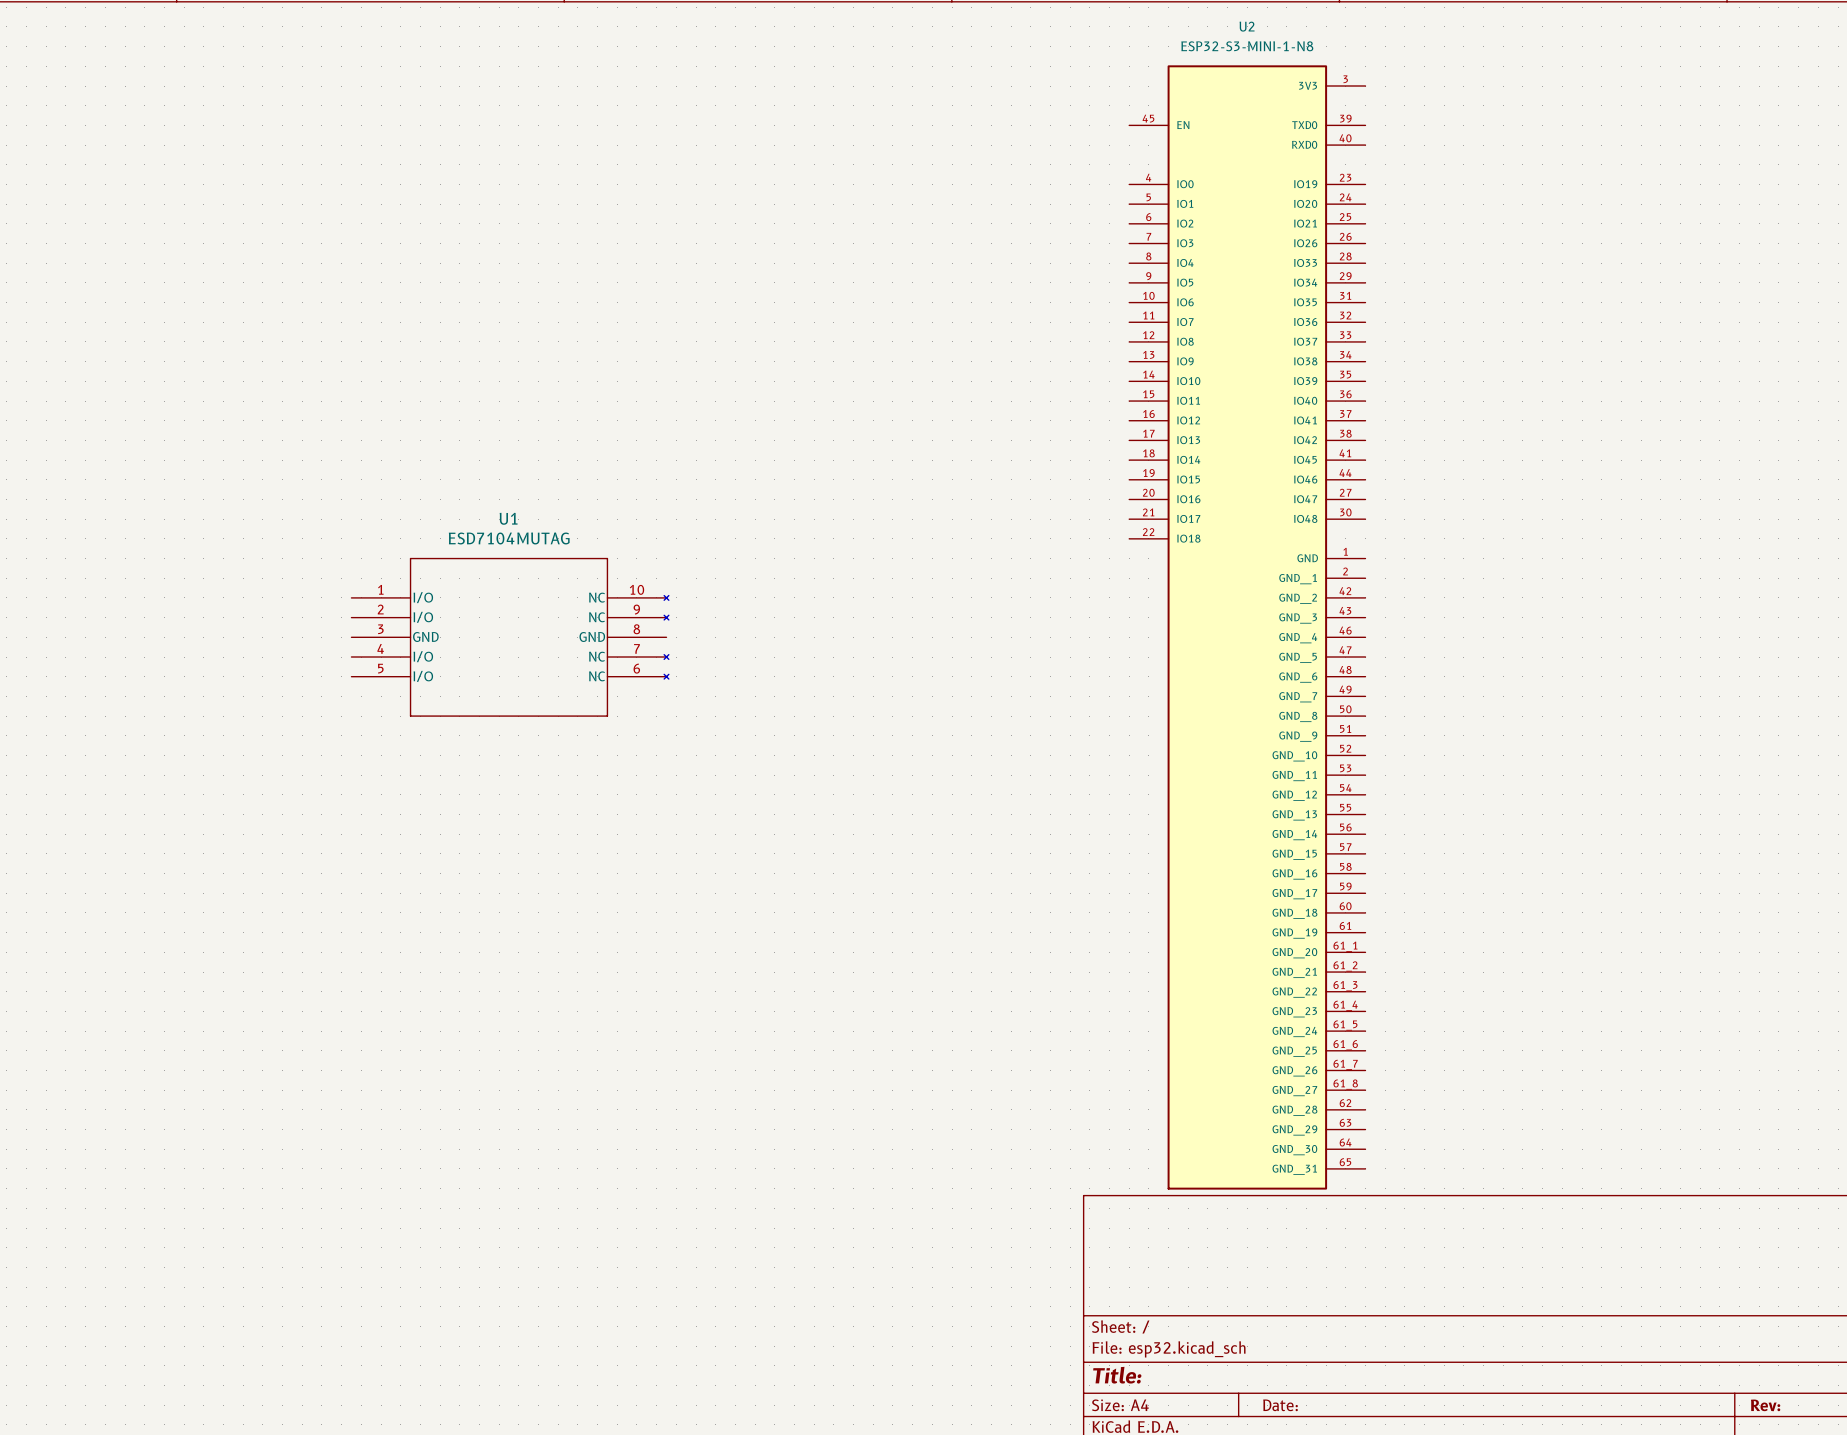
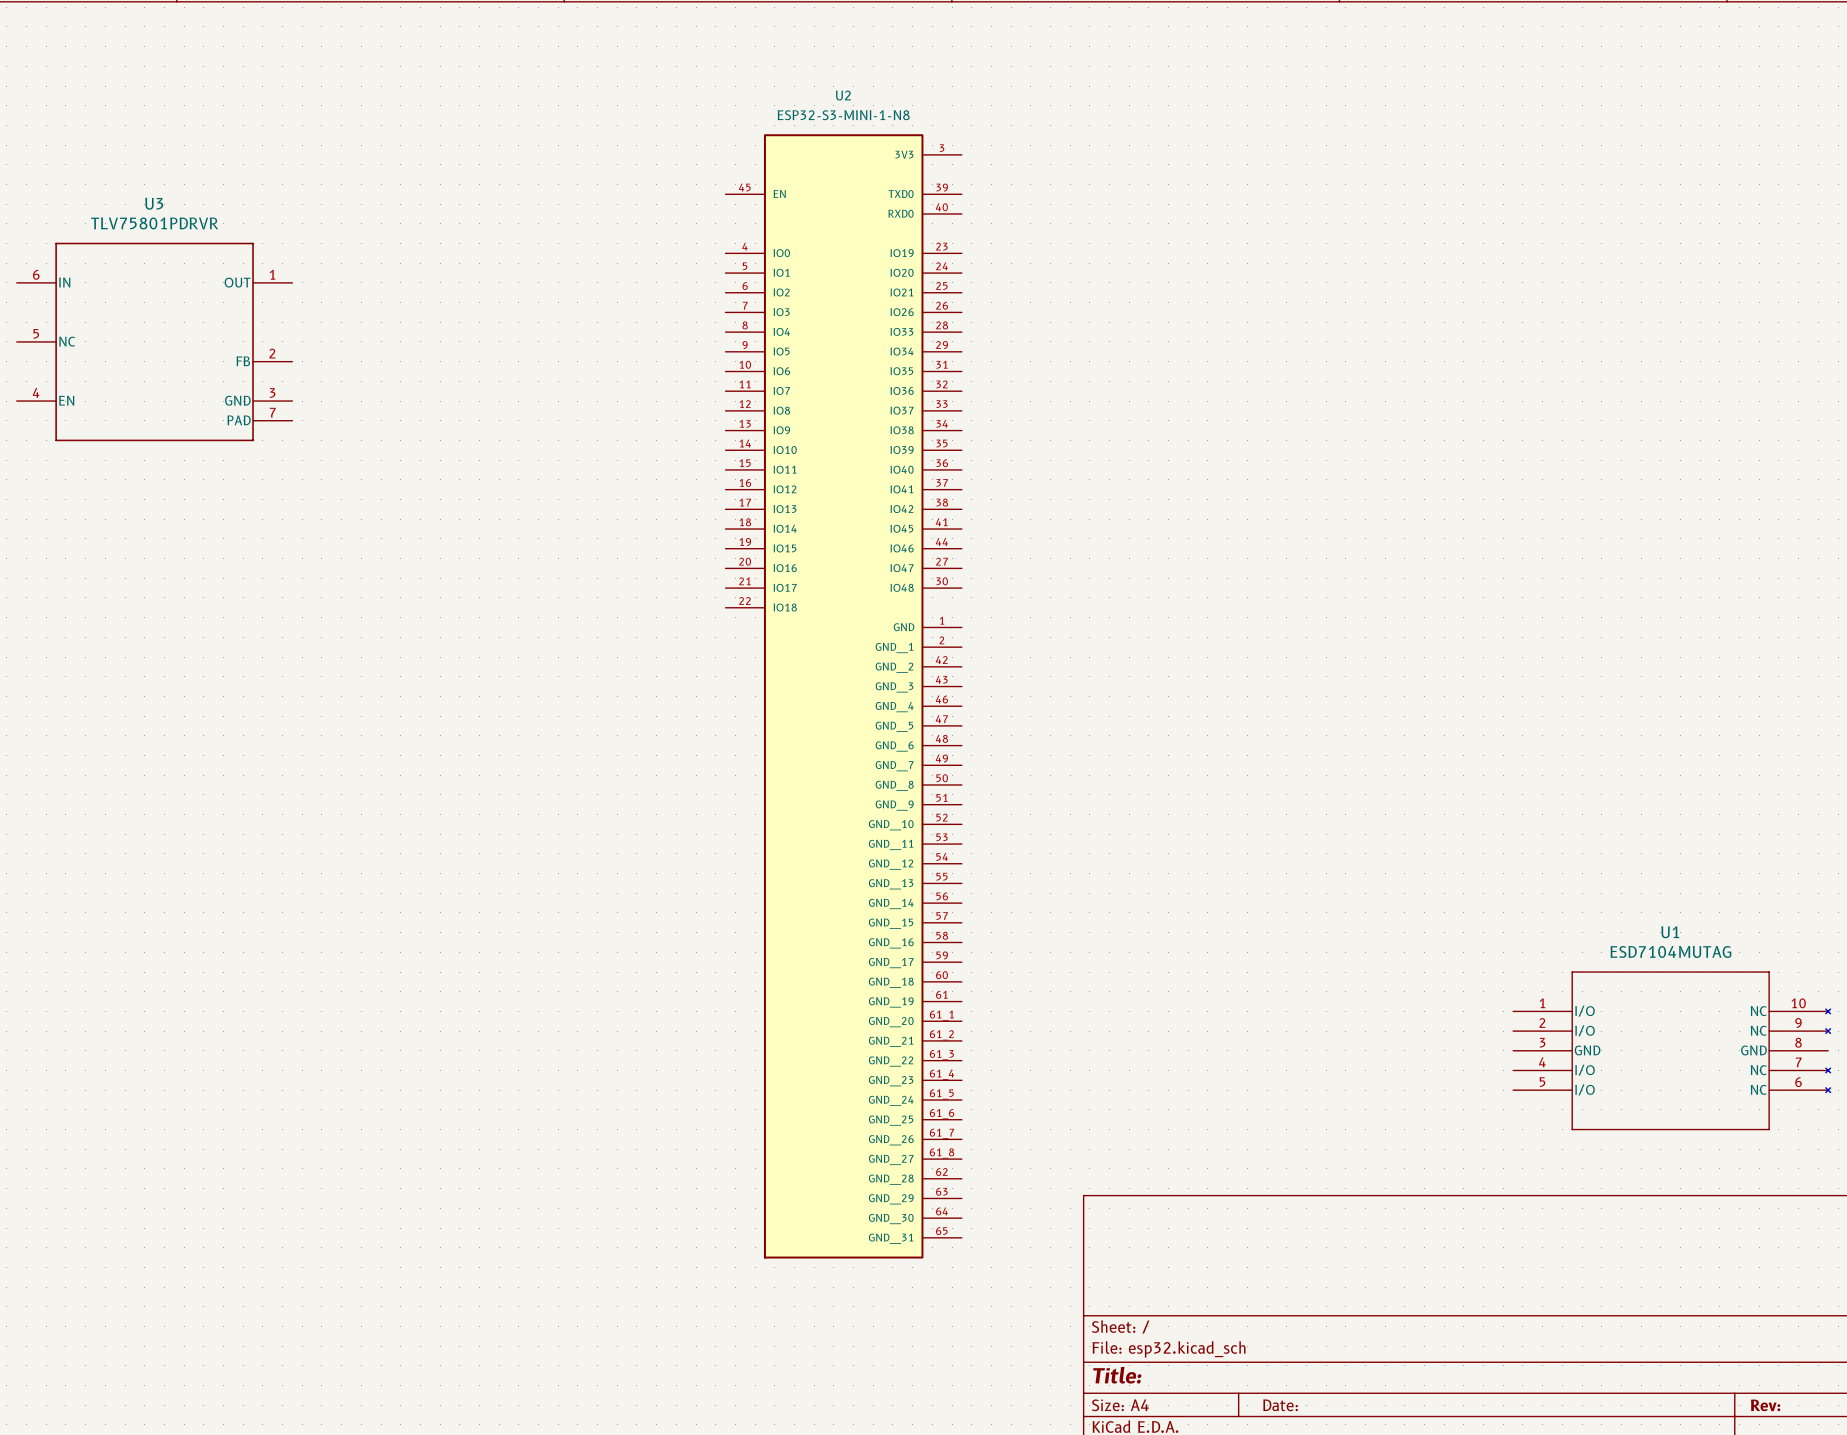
U3: none -> TLV75801PDRVR (154, 341)
U2 position: (1247, 627) -> (843, 696)
U1 position: (510, 637) -> (1671, 1050)

